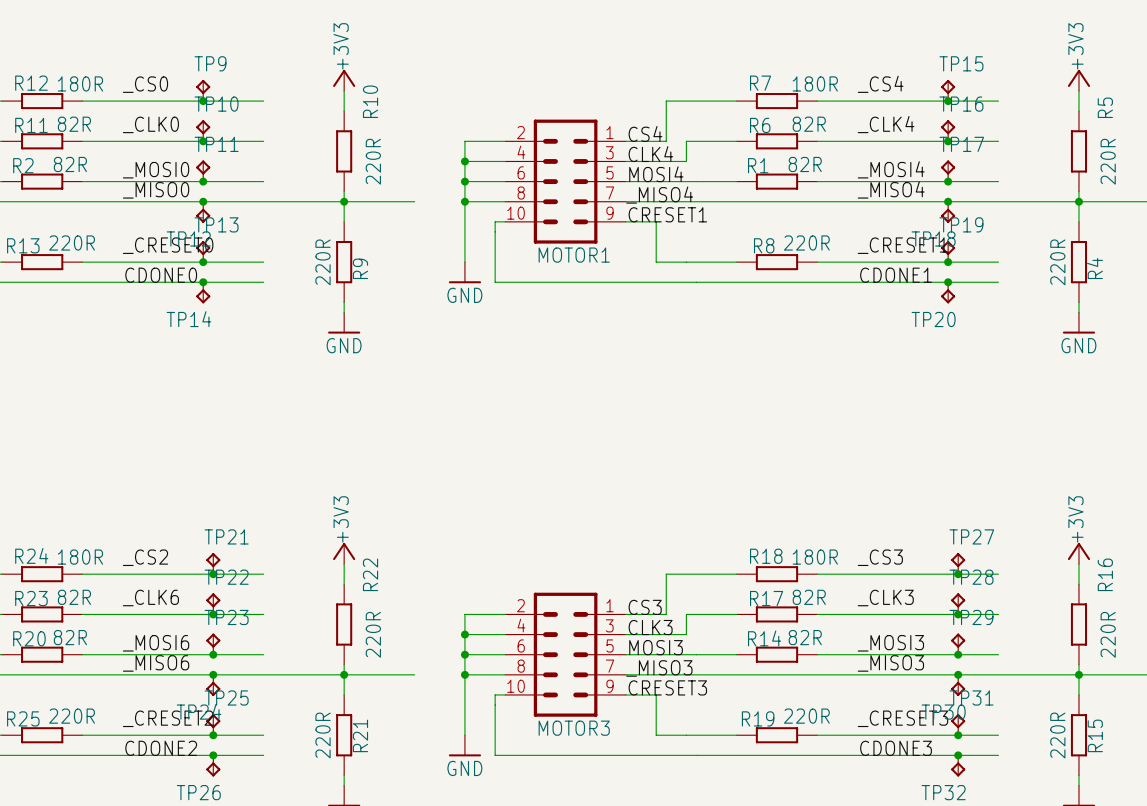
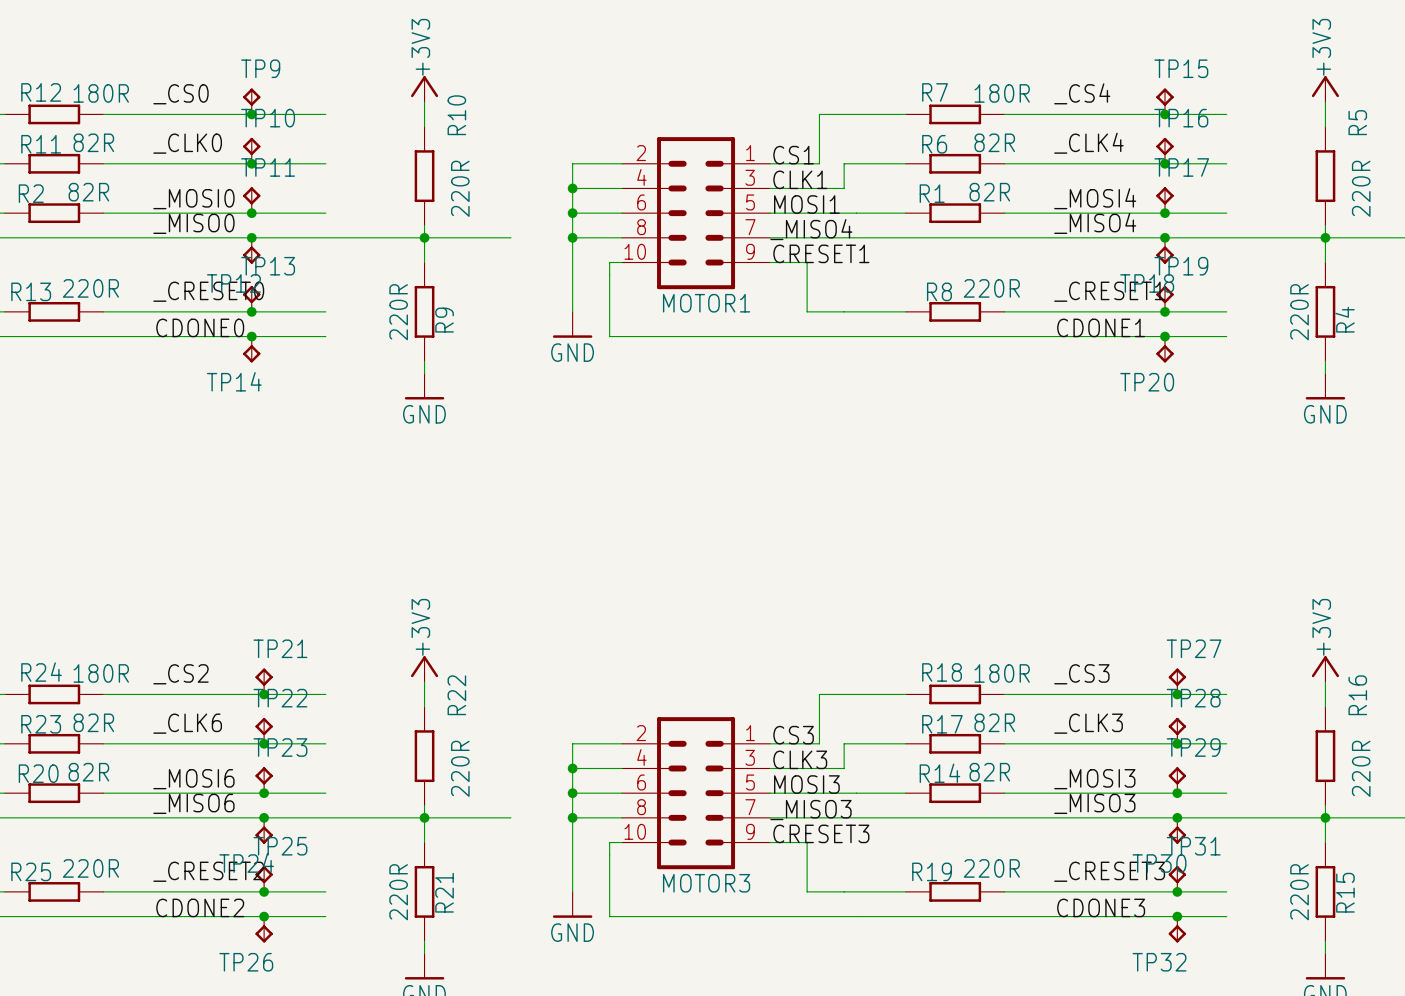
label: CS4 (645, 133) -> CS1 (793, 155)
label: CLK4 (650, 154) -> CLK1 (800, 179)
label: MOSI4 (656, 174) -> MOSI1 (806, 204)

